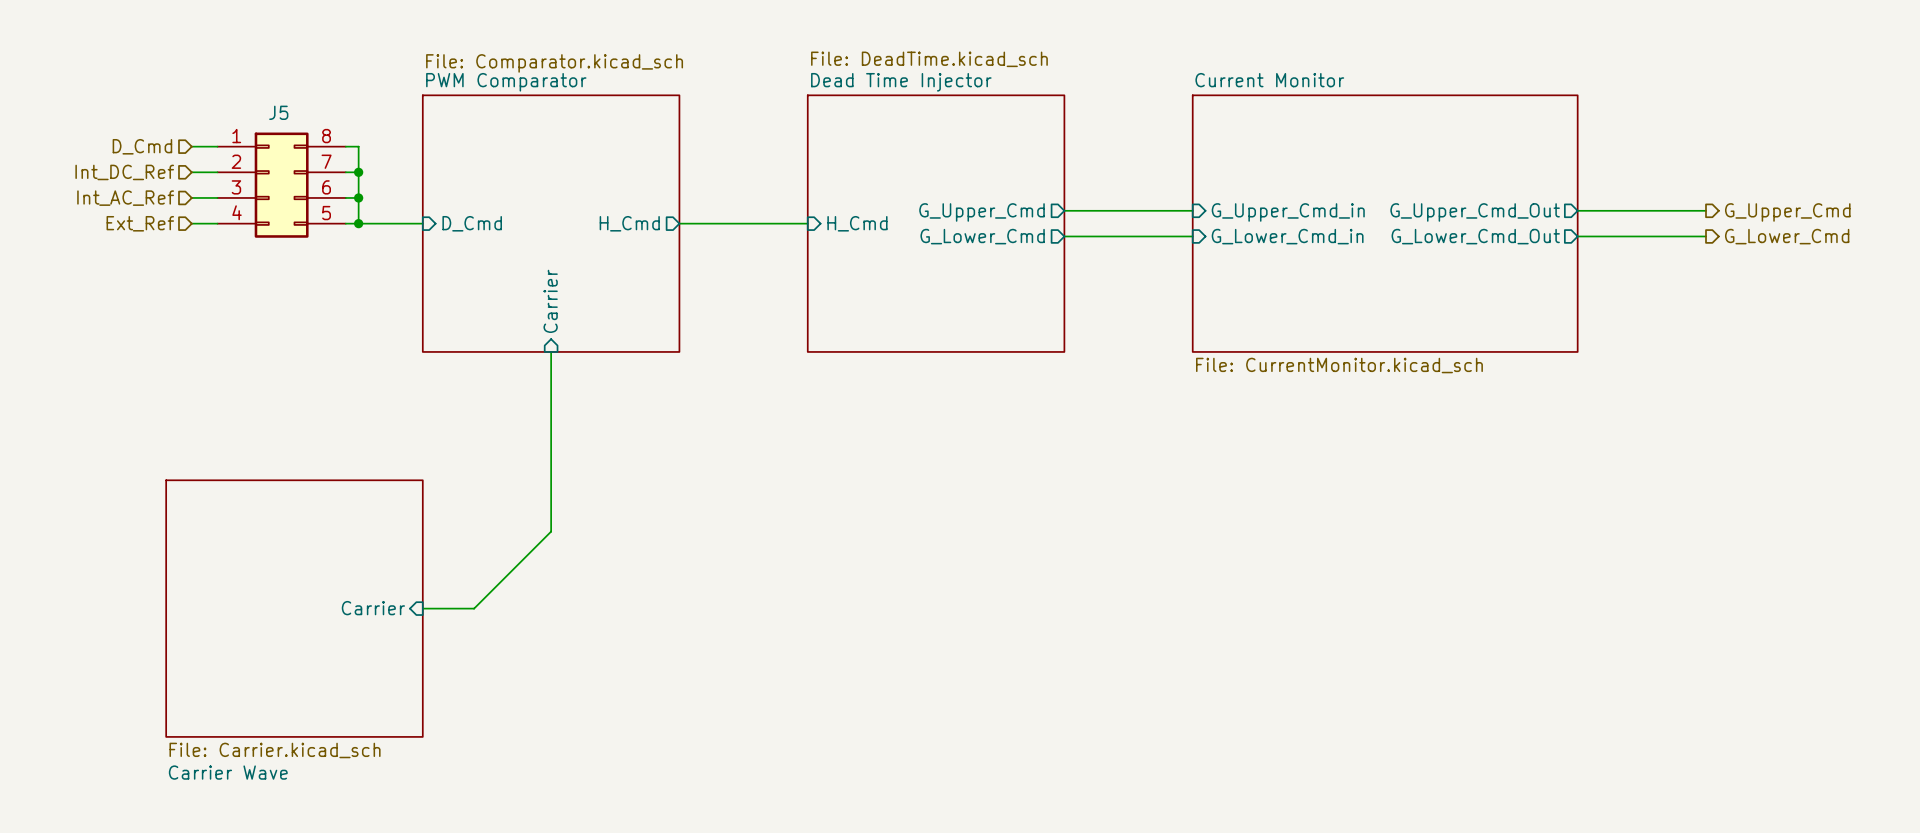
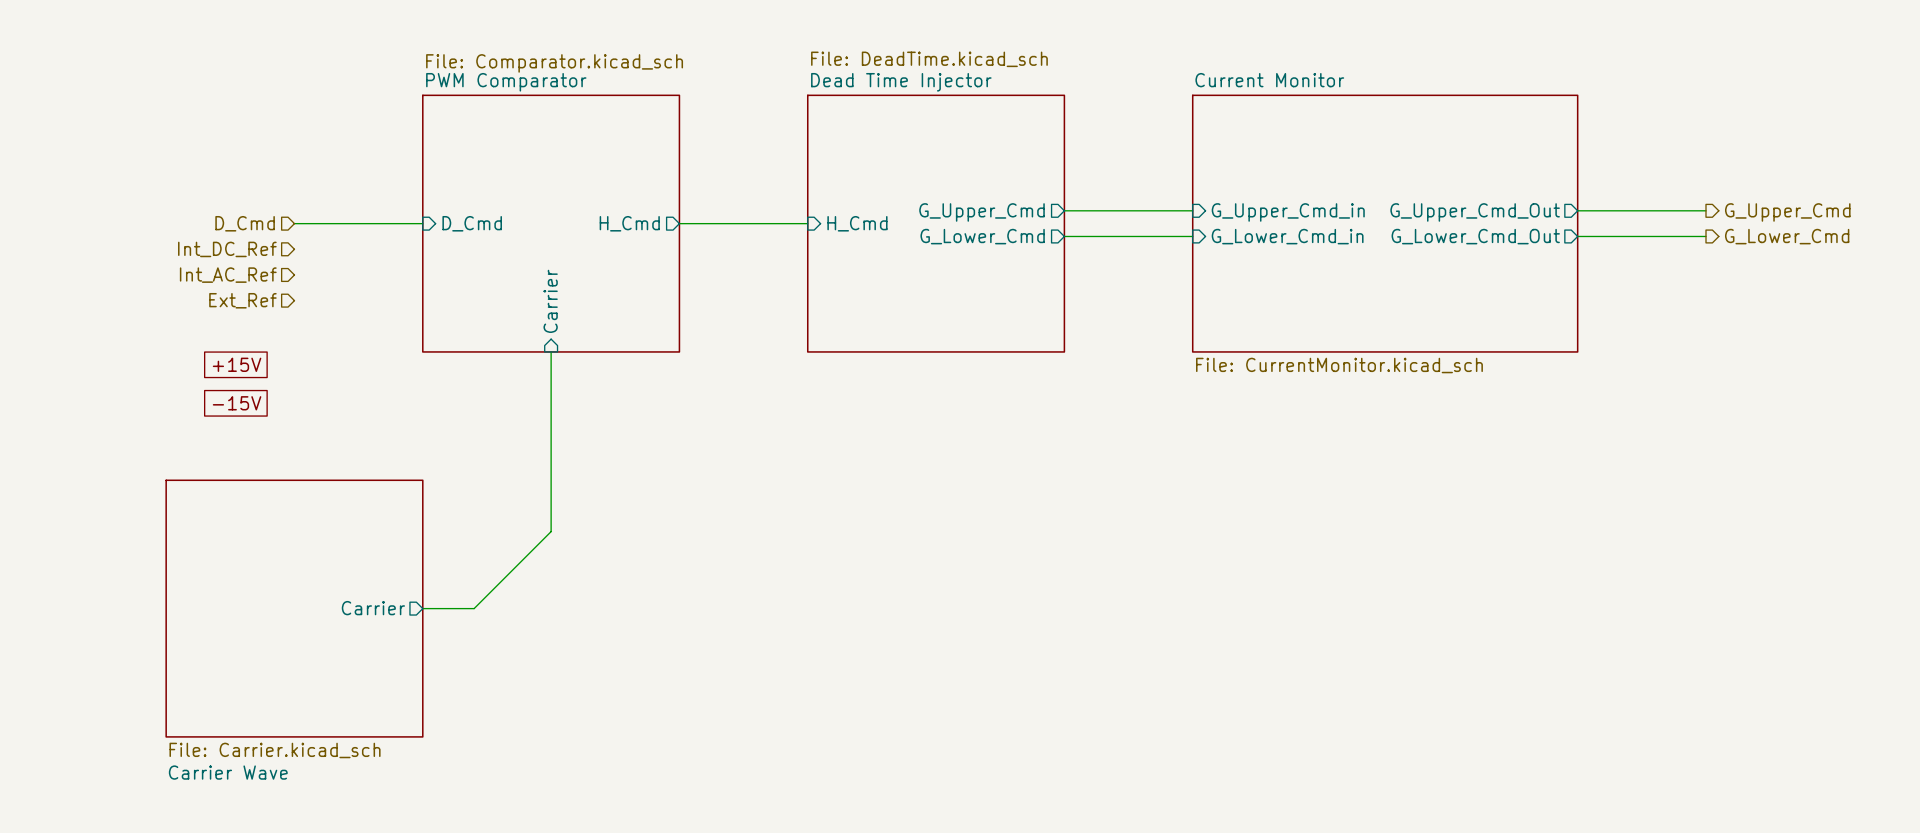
hierarchical label position: D_Cmd (142, 146) -> D_Cmd (245, 223)
wire: (191, 146) (217, 146) -> none
wire: (345, 146) (358, 146) (358, 223) -> none
hierarchical label position: Int_DC_Ref (124, 172) -> Int_DC_Ref (227, 249)
wire: (191, 172) (217, 172) -> none
wire: (345, 172) (358, 172) -> none
junction: (358, 172) -> none
J5: (281, 185) -> none
wire: (191, 197) (217, 197) -> none
wire: (345, 197) (358, 197) -> none
junction: (358, 197) -> none
hierarchical label position: Int_AC_Ref (125, 198) -> Int_AC_Ref (228, 275)
hierarchical label position: Ext_Ref (140, 223) -> Ext_Ref (242, 300)
wire: (191, 223) (217, 223) -> none
junction: (358, 223) -> none
global label: none -> +15V (237, 364)
global label: none -> -15V (237, 403)
sheet pin shape: input (373, 608) -> output (373, 608)

